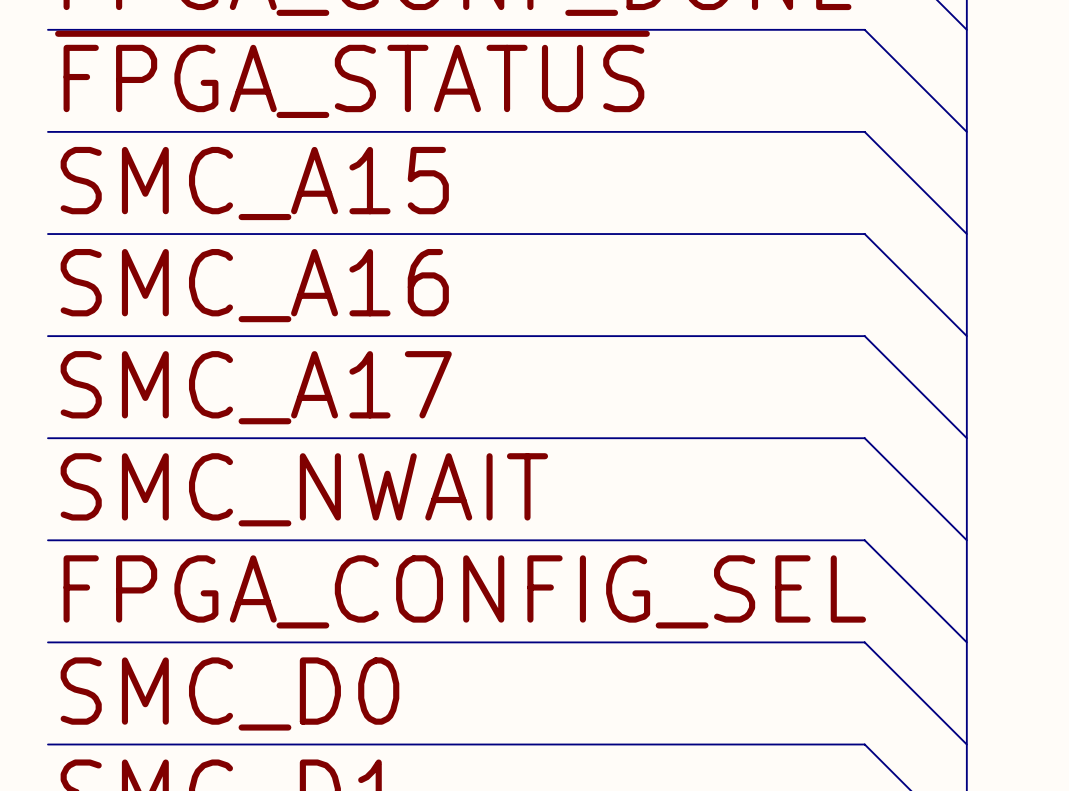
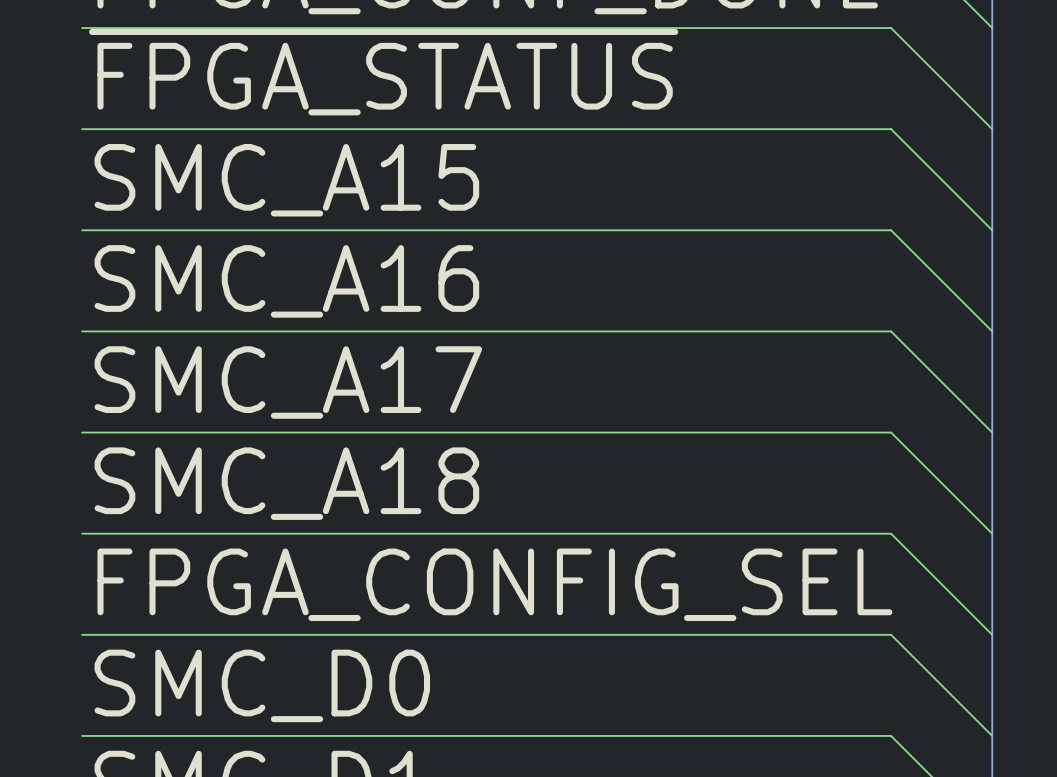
label: SMC_NWAIT (304, 489) -> SMC_A18 (286, 483)

